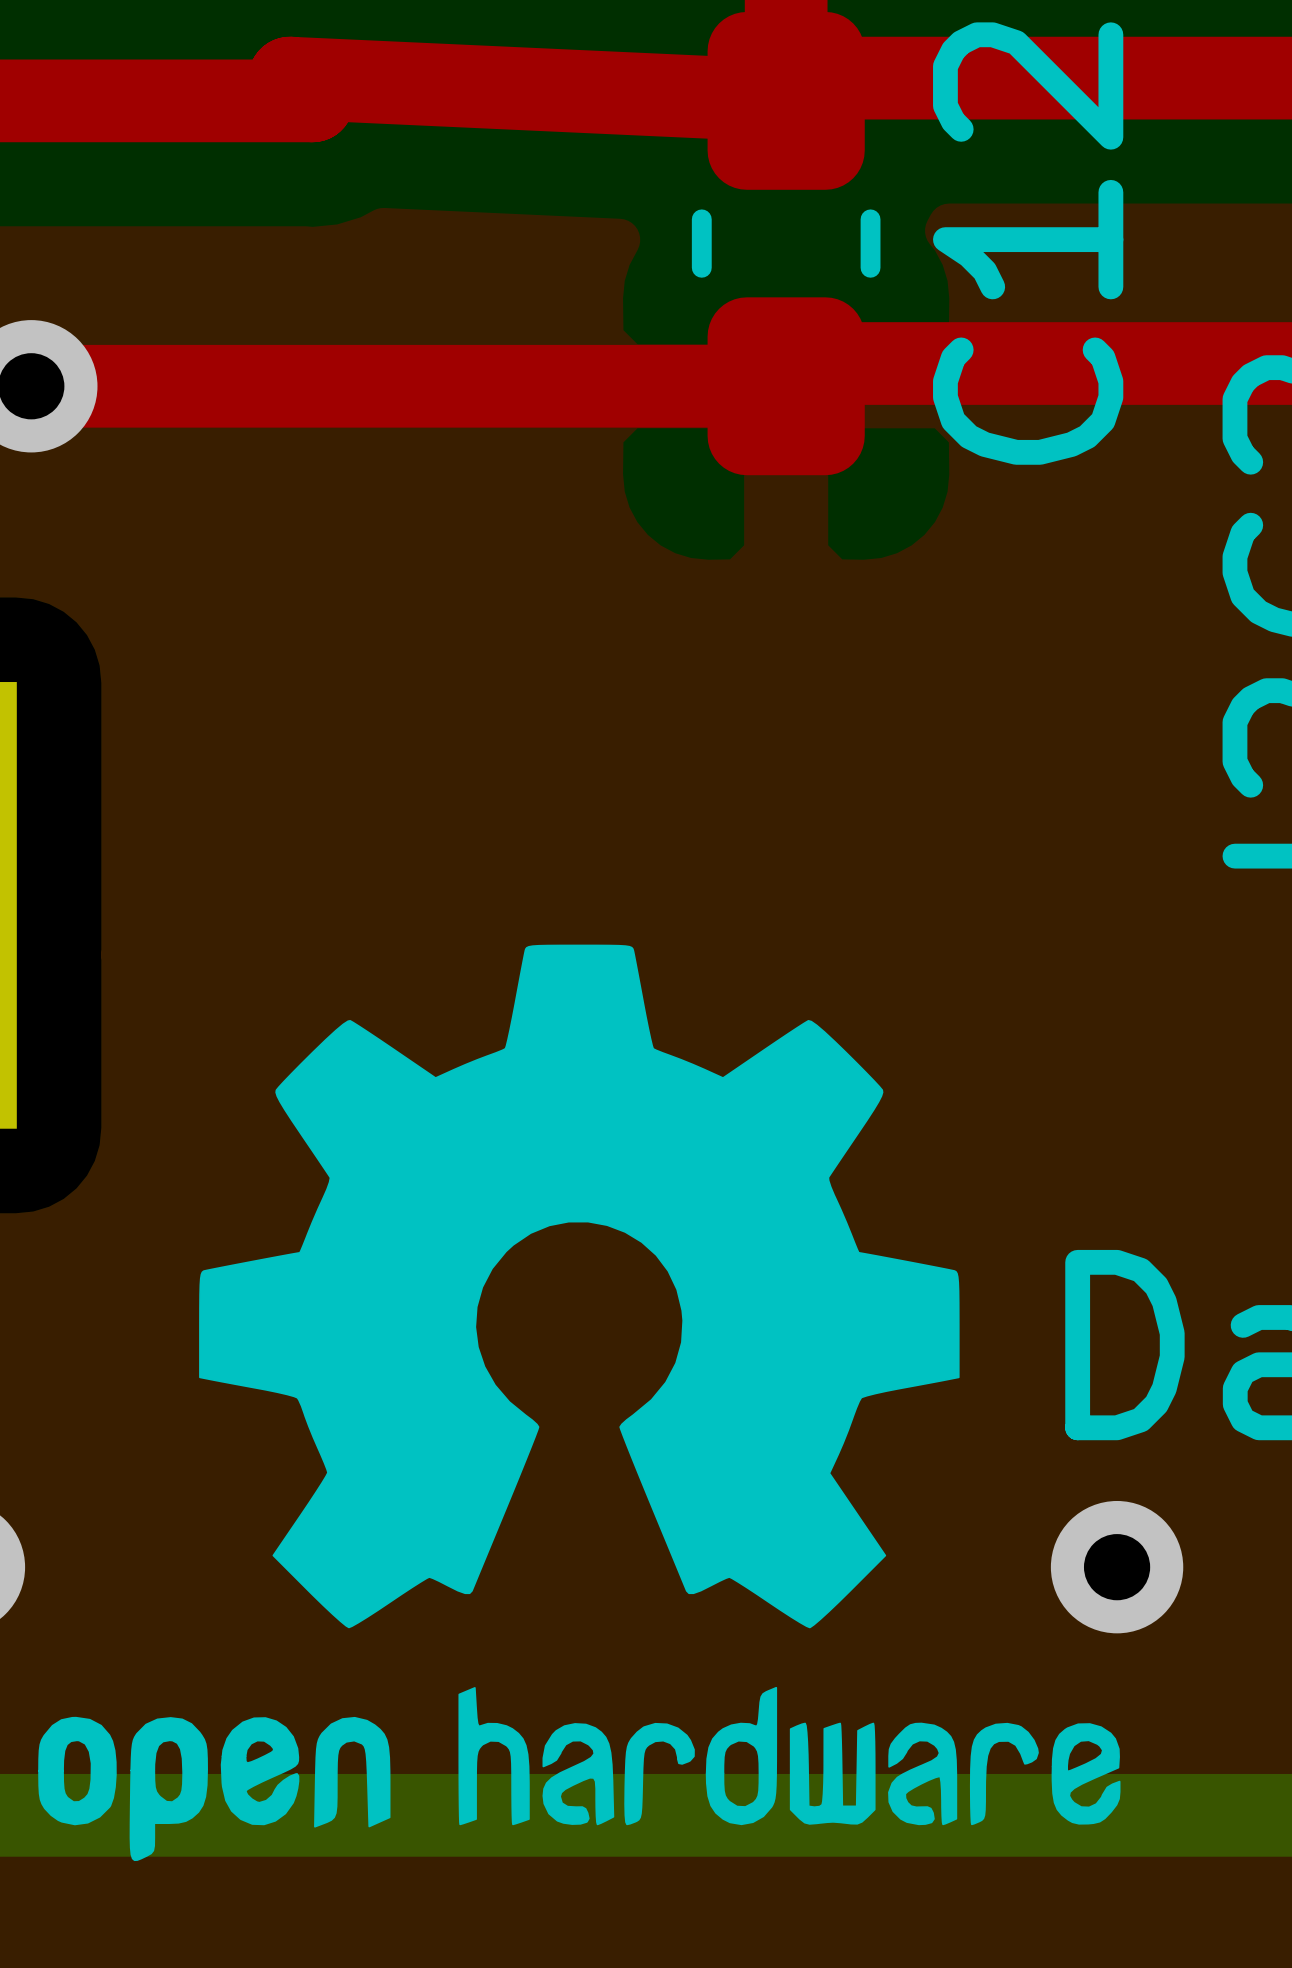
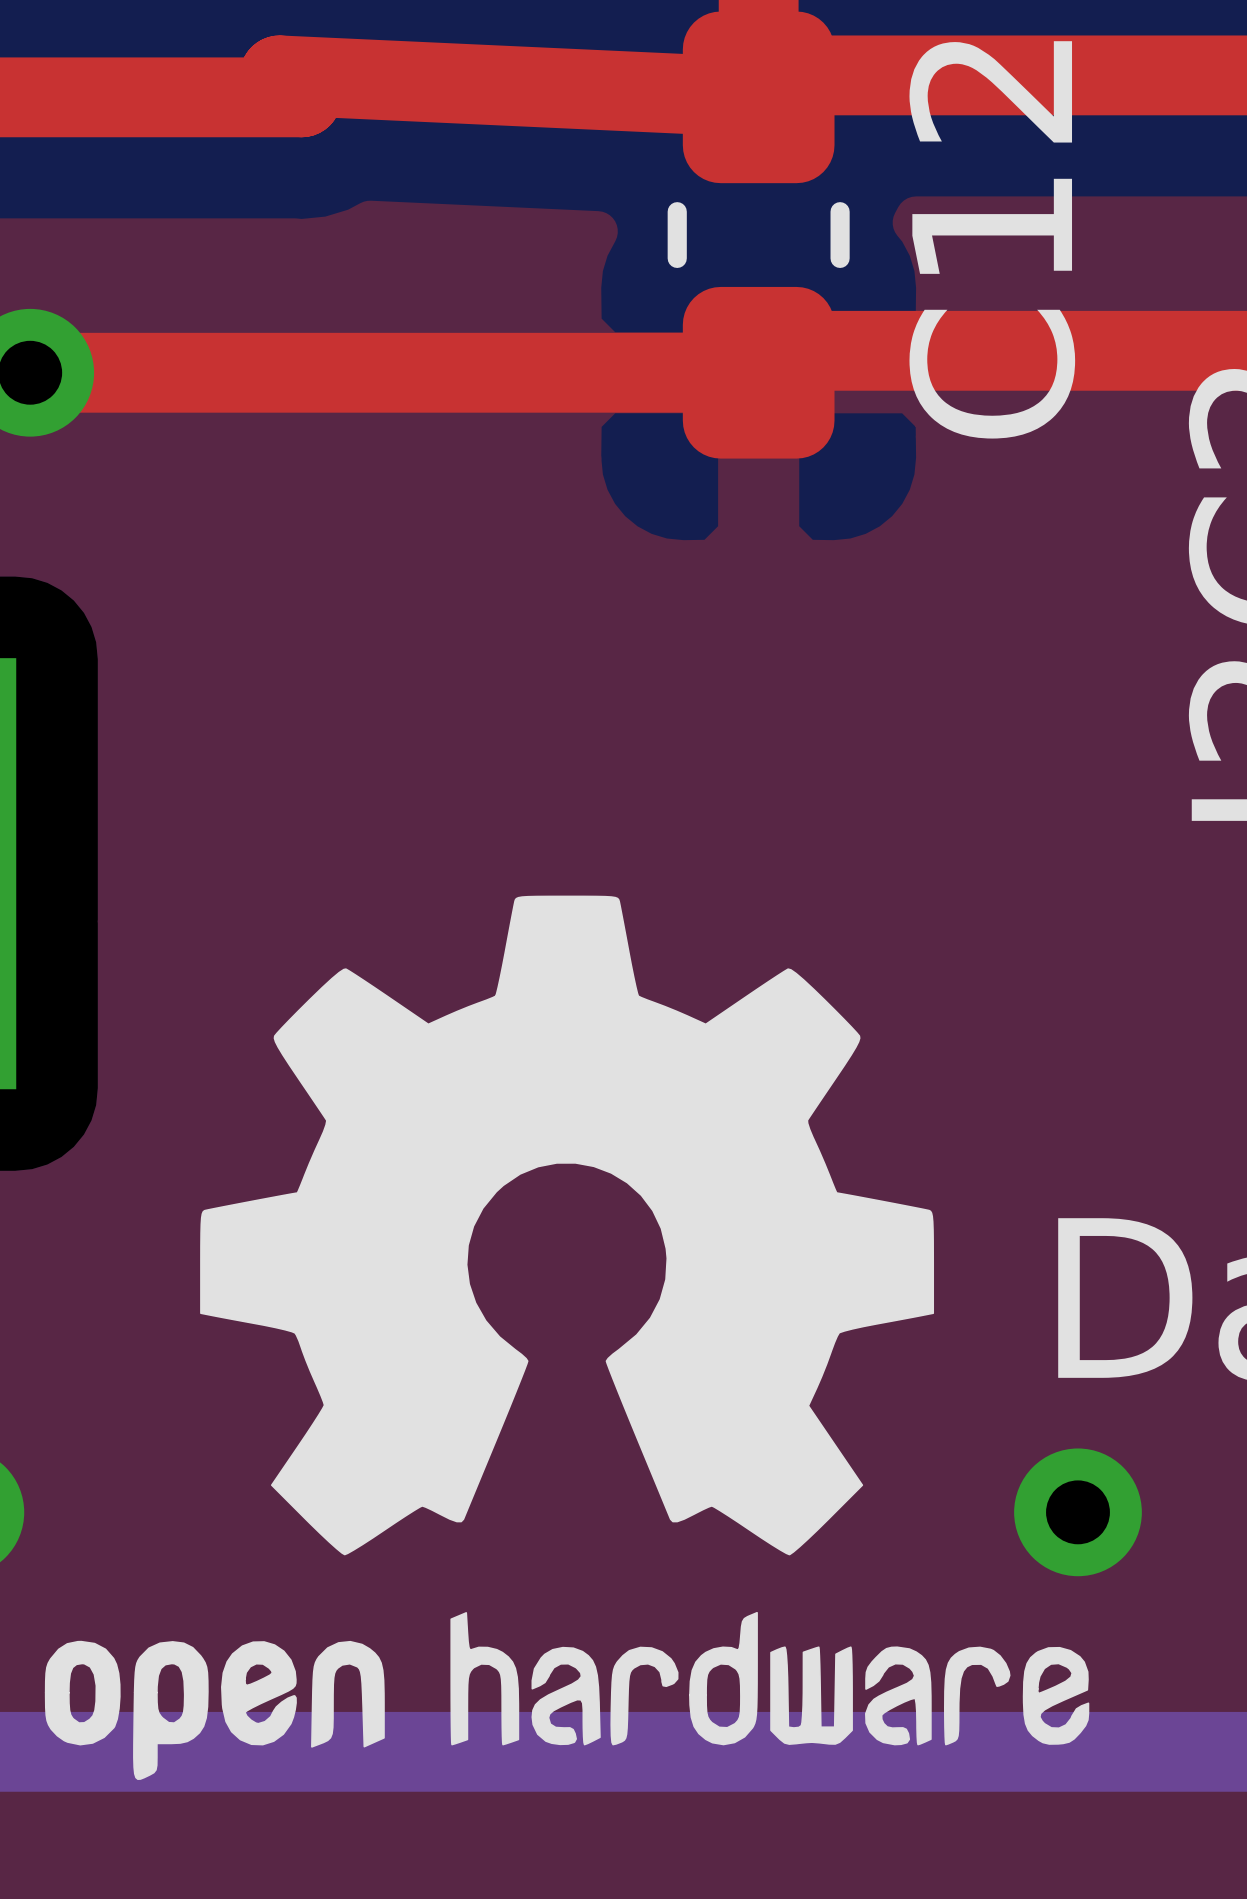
drawing position: (579, 1402) -> (567, 1337)

